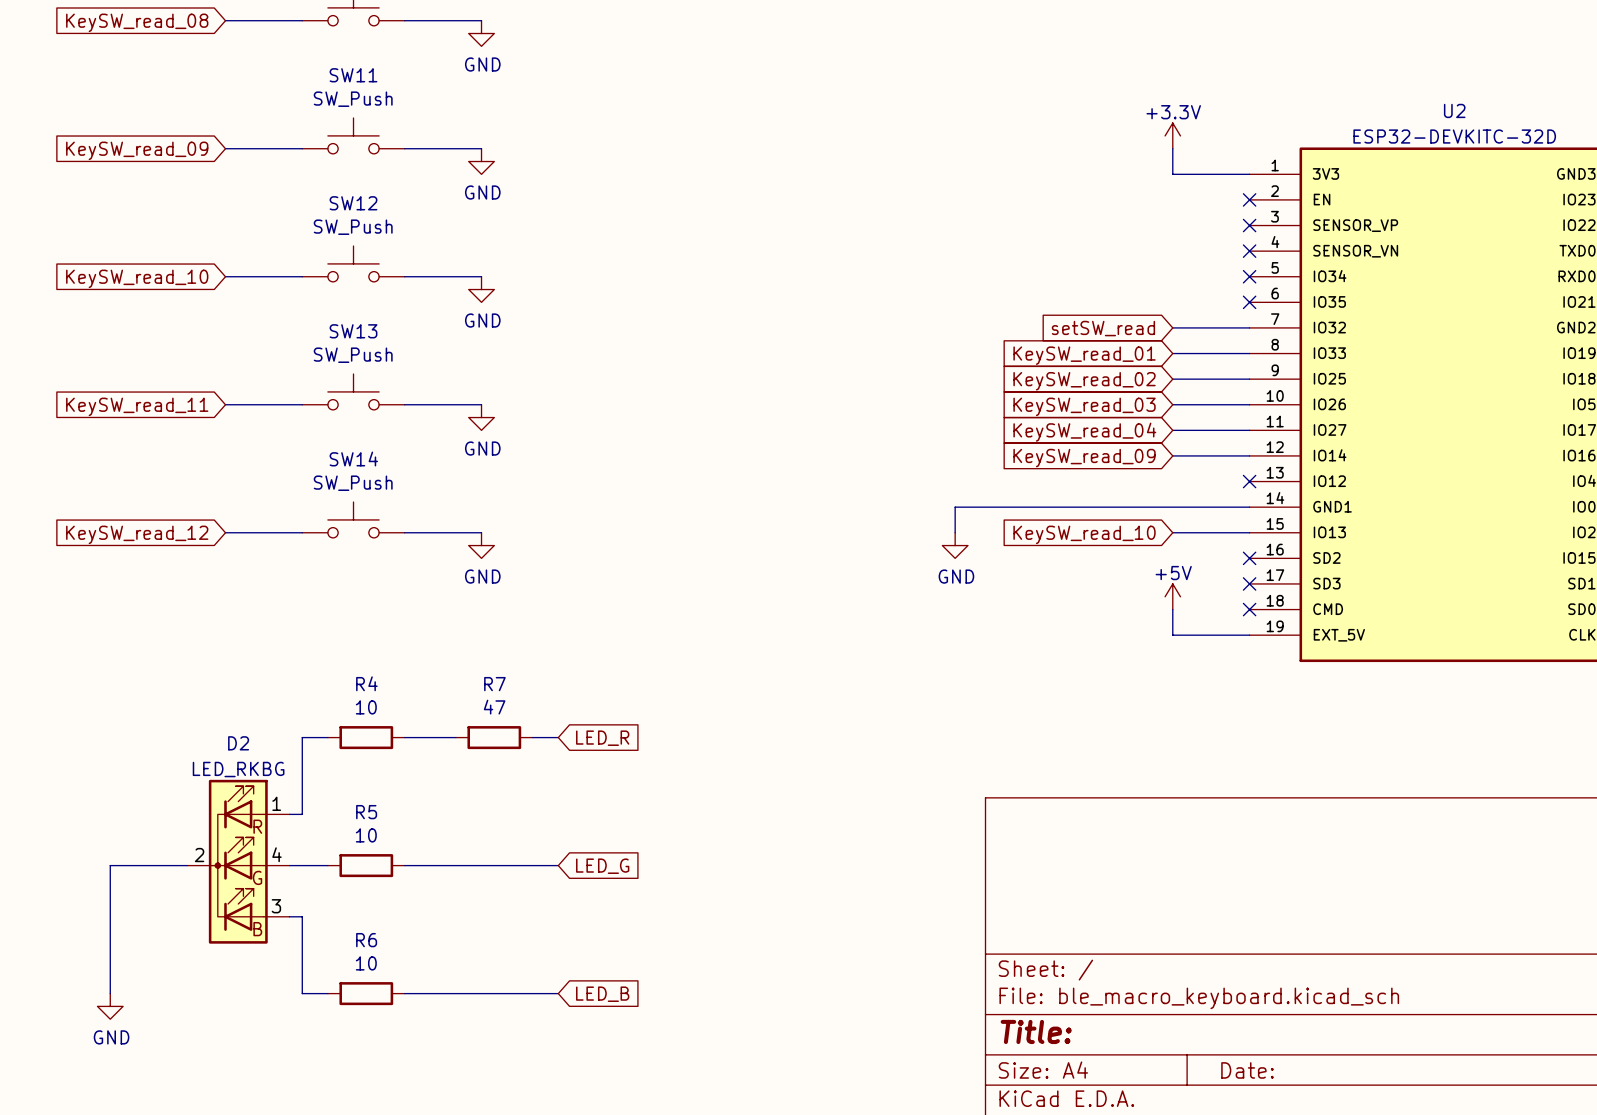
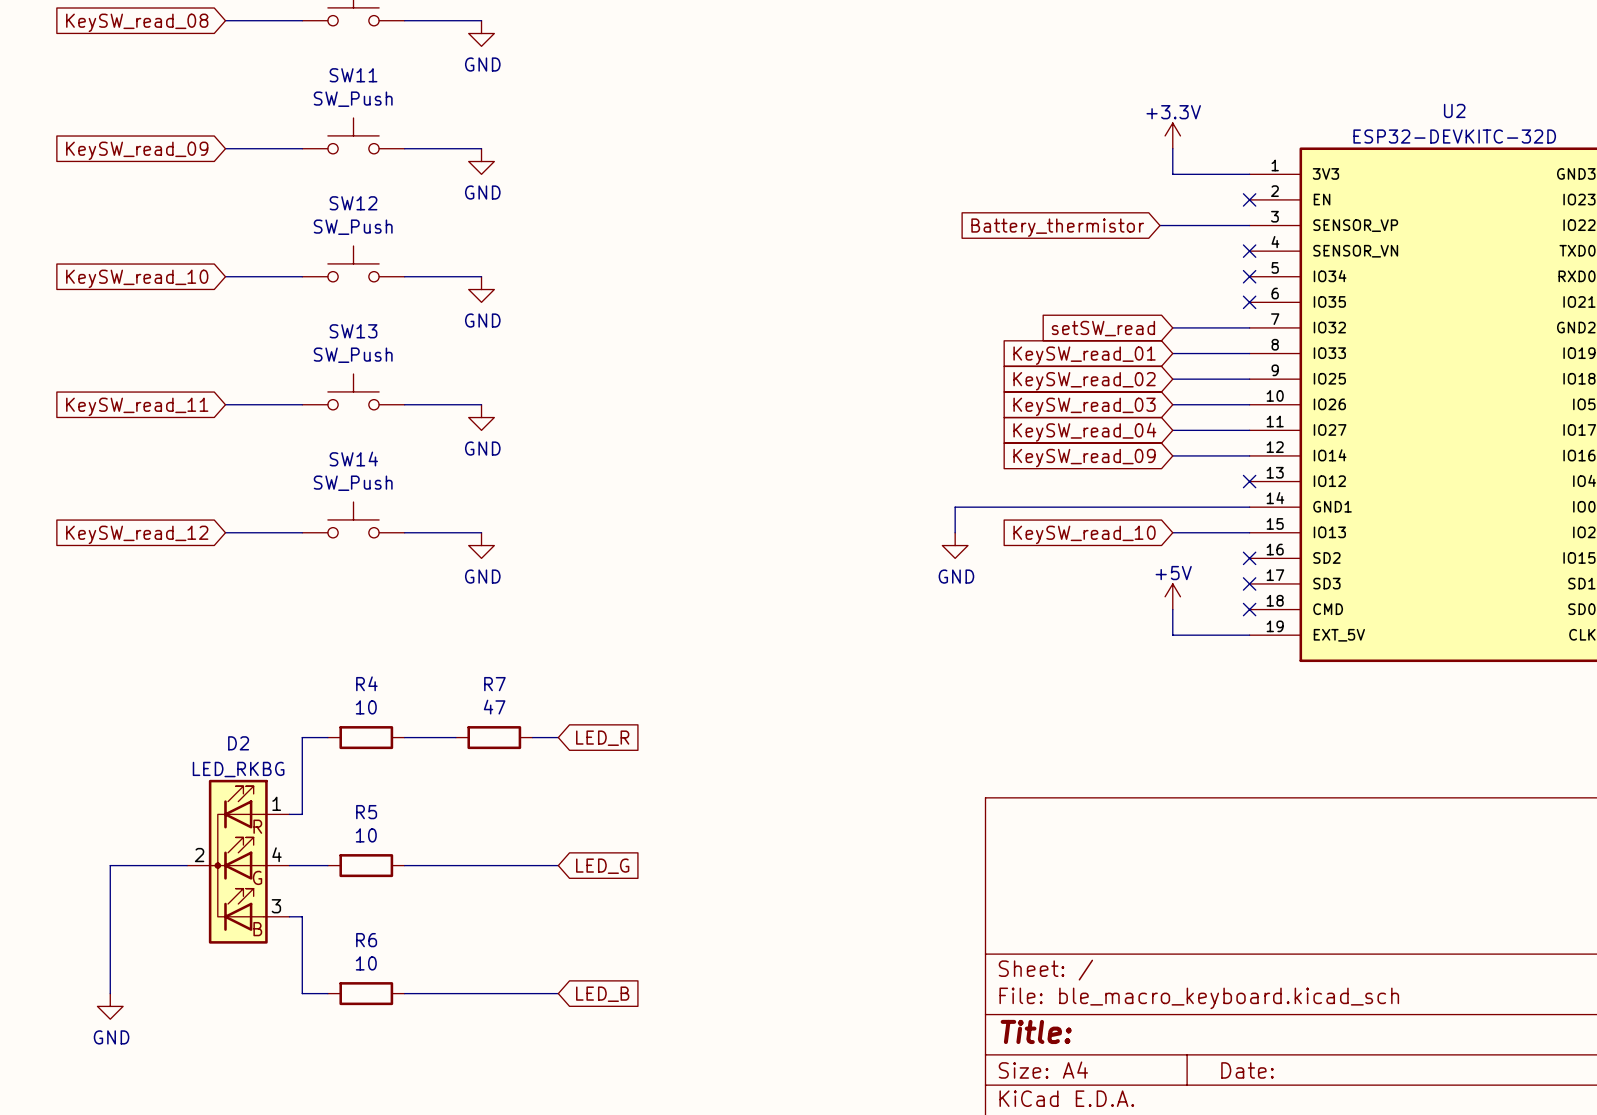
wire: none -> (1159, 225) (1249, 225)
no-connect mark: (1249, 225) -> none
global label: none -> Battery_thermistor (1057, 227)

